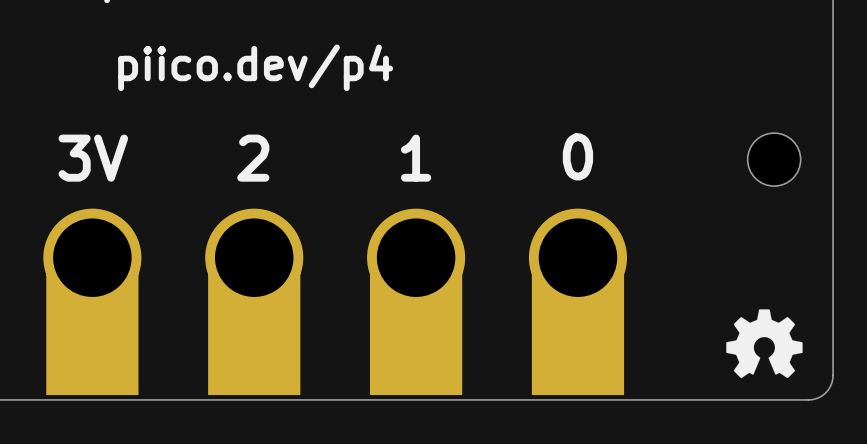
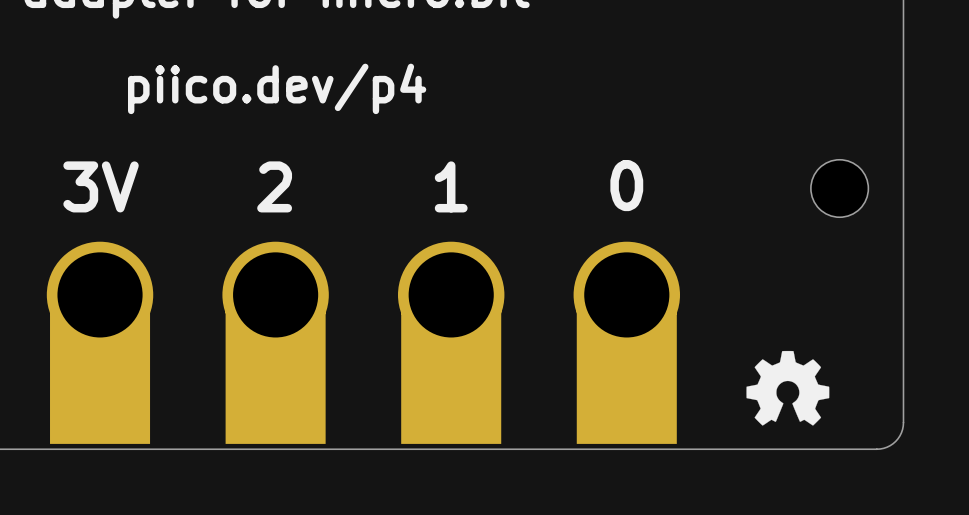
drawing position: (764, 343) -> (787, 388)

